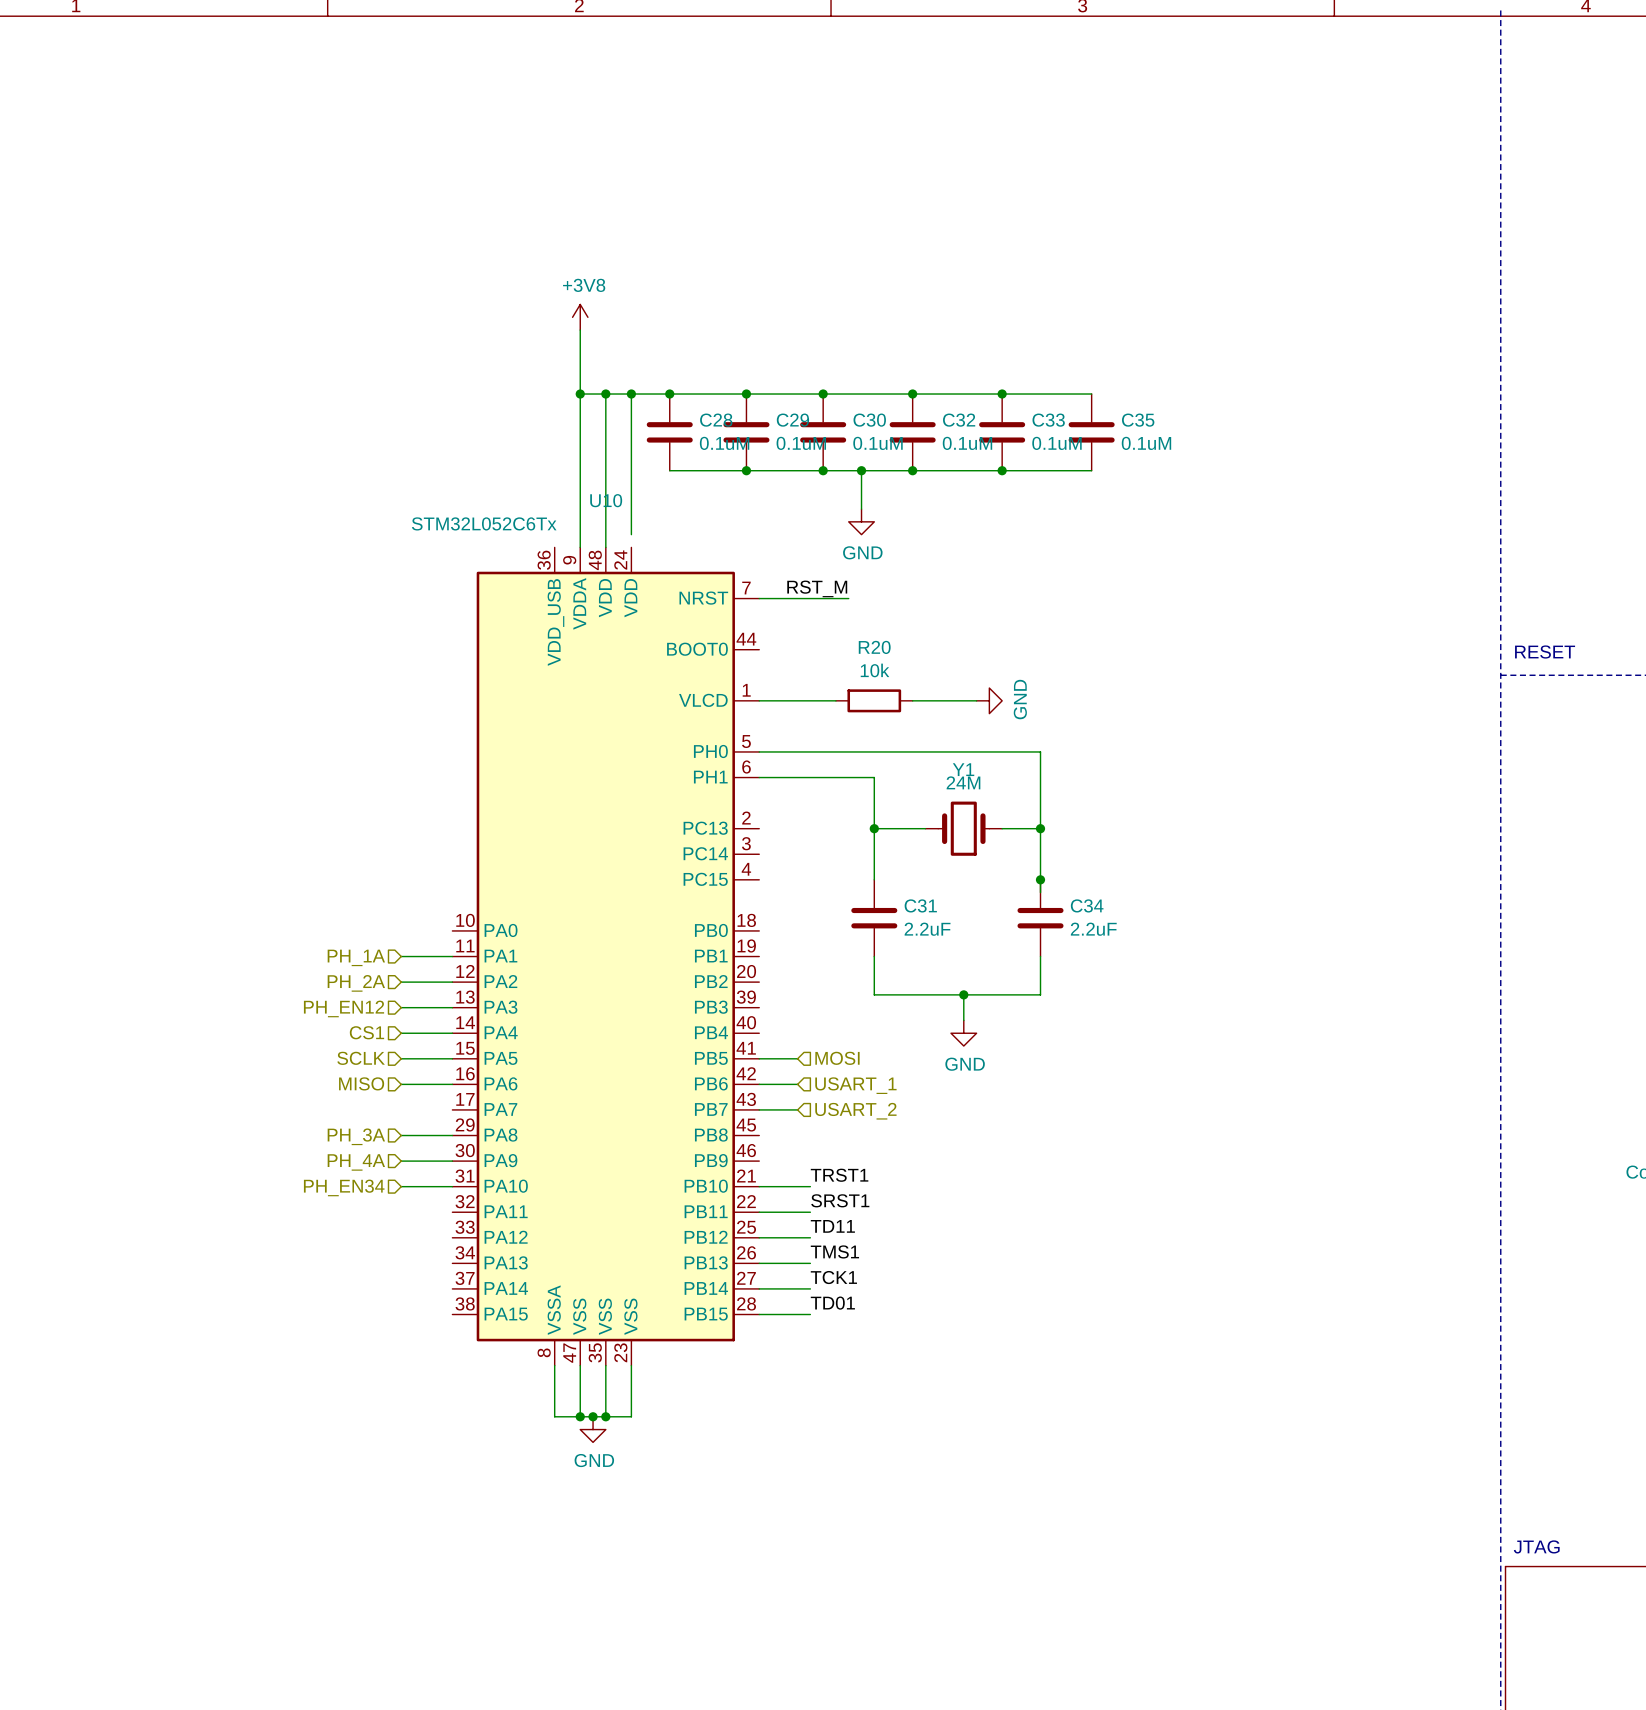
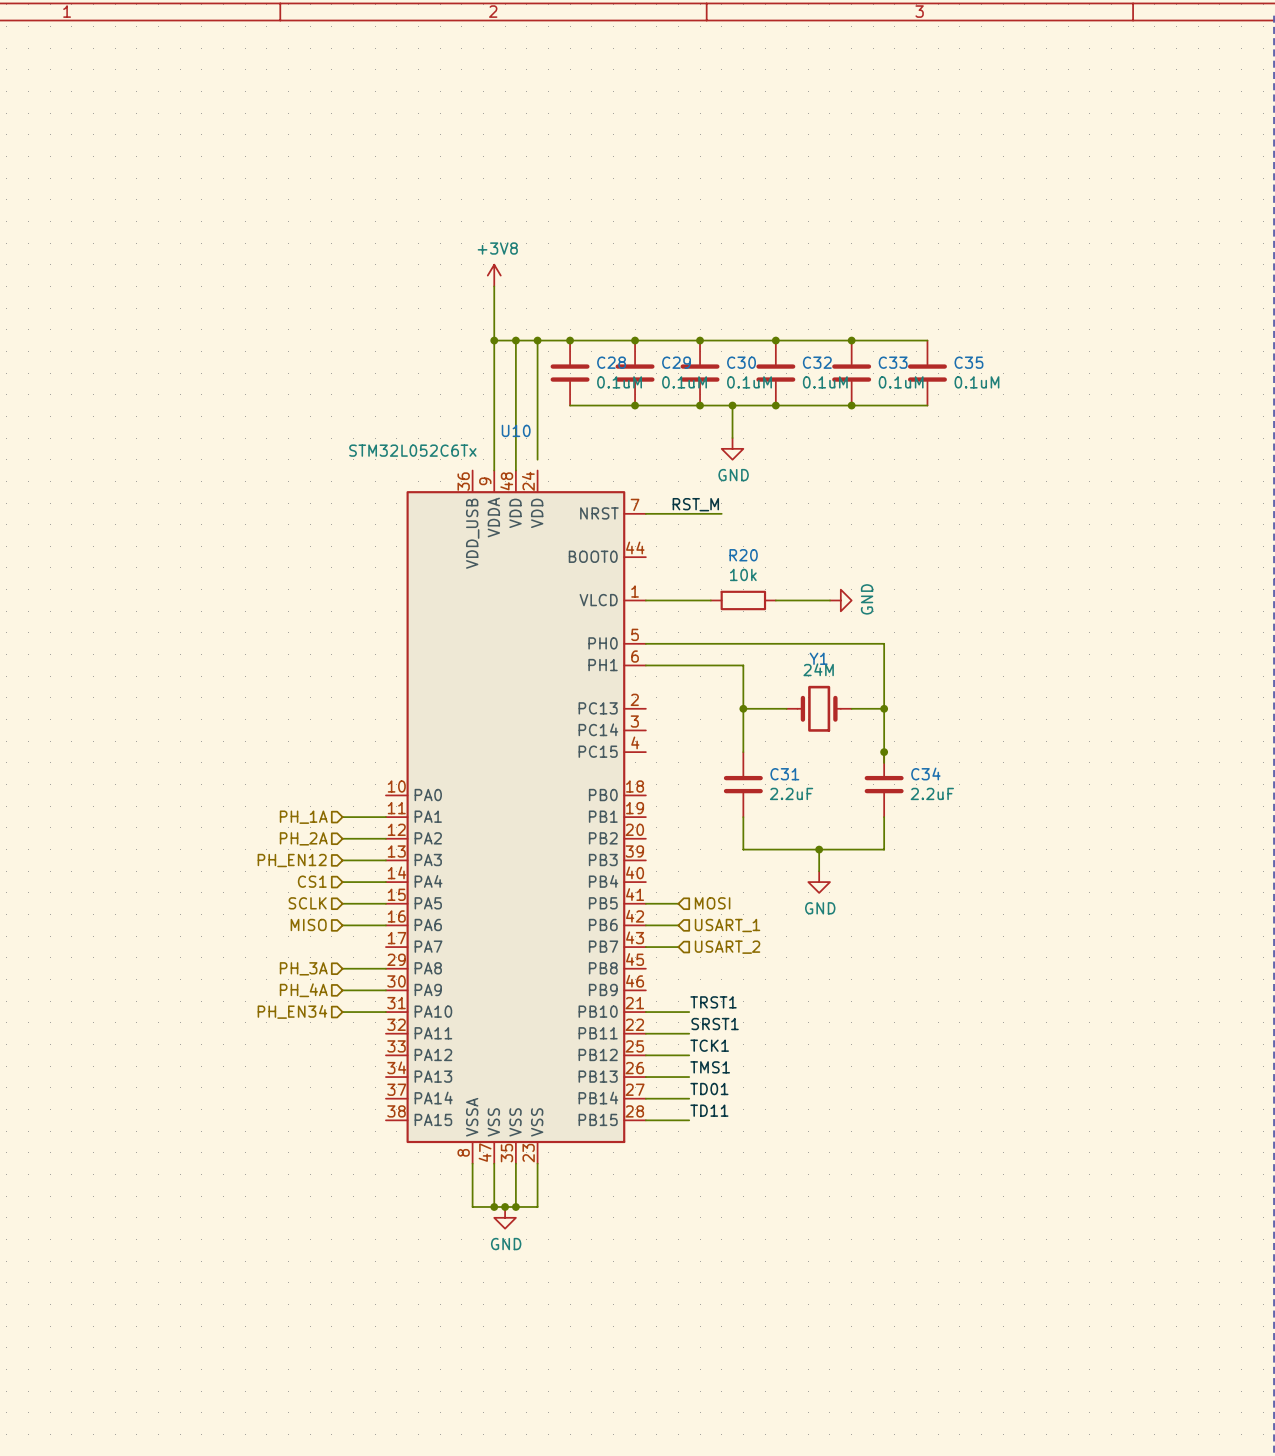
label: TD11 (832, 1226) -> TCK1 (709, 1045)
label: TCK1 (833, 1277) -> TD01 (709, 1089)
label: TD01 (832, 1303) -> TD11 (709, 1110)

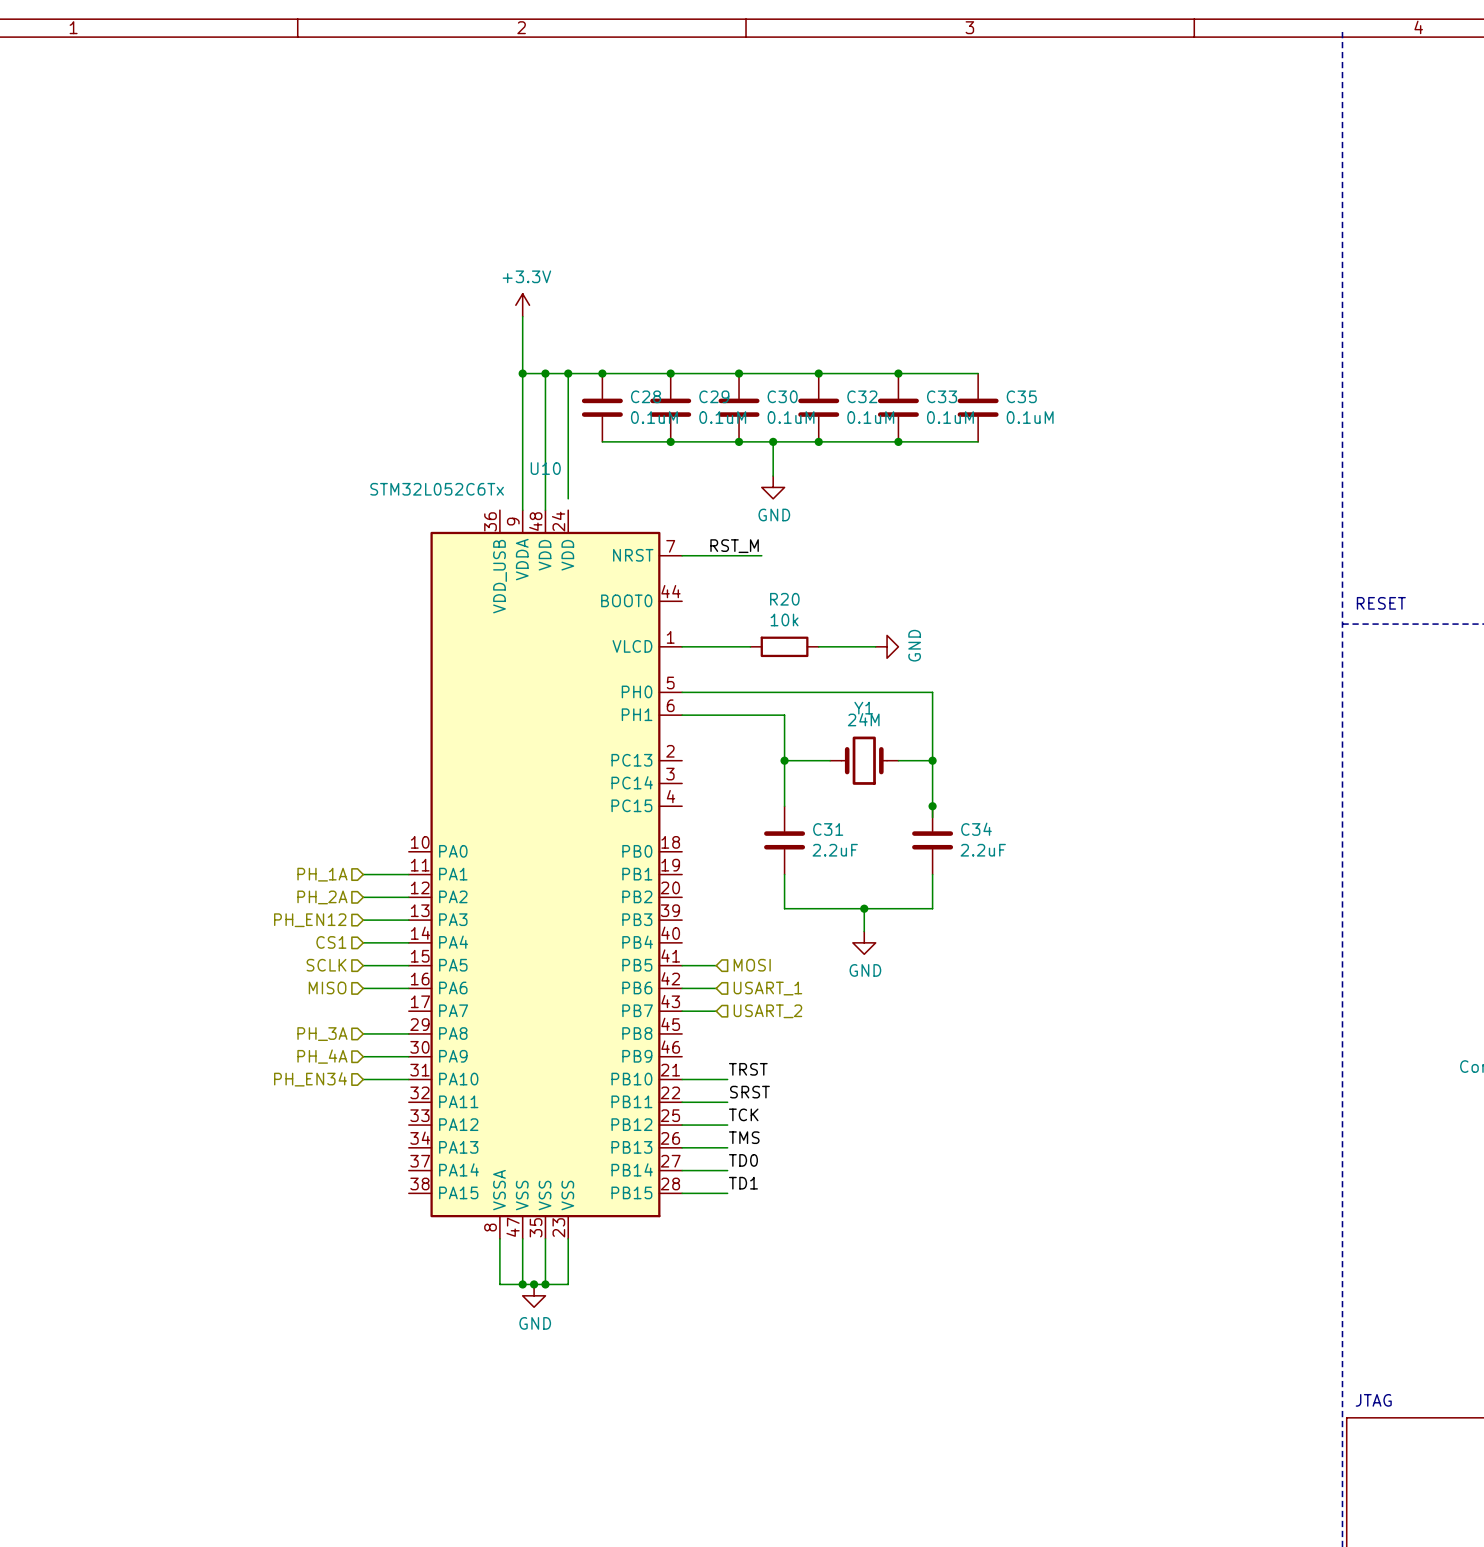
power symbol: +3V8 (494, 275) -> +3.3V (522, 305)
label: TRST1 (713, 1002) -> TRST (748, 1069)
label: SRST1 (715, 1024) -> SRST (749, 1092)
label: TCK1 (709, 1045) -> TCK (743, 1114)
label: TMS1 (710, 1067) -> TMS (744, 1137)
label: TD01 (709, 1089) -> TD0 (743, 1160)
label: TD11 (709, 1110) -> TD1 (743, 1183)

